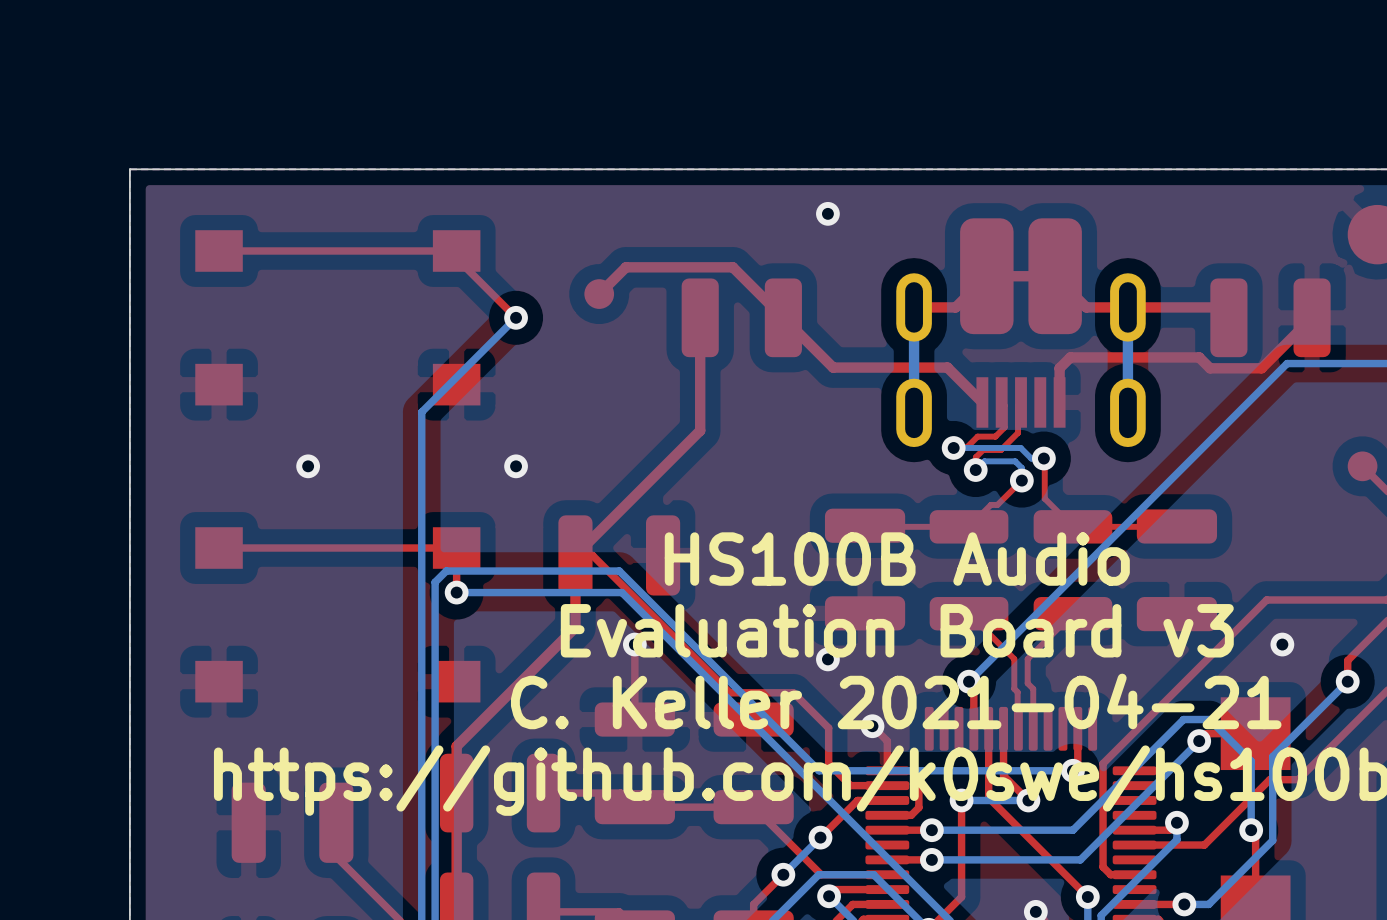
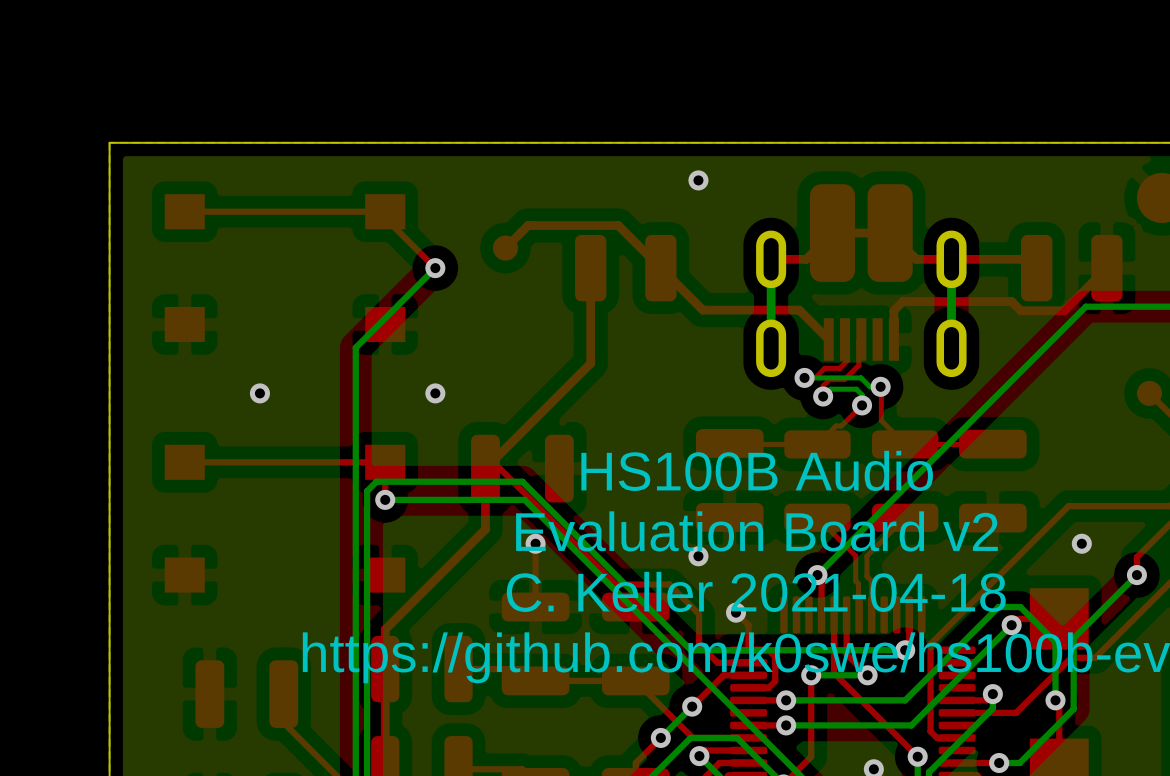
text: Evaluation Board v3 (897, 630) -> Evaluation Board v2 (756, 531)
text: C. Keller 2021-04-21 (896, 701) -> C. Keller 2021-04-18 (756, 591)

